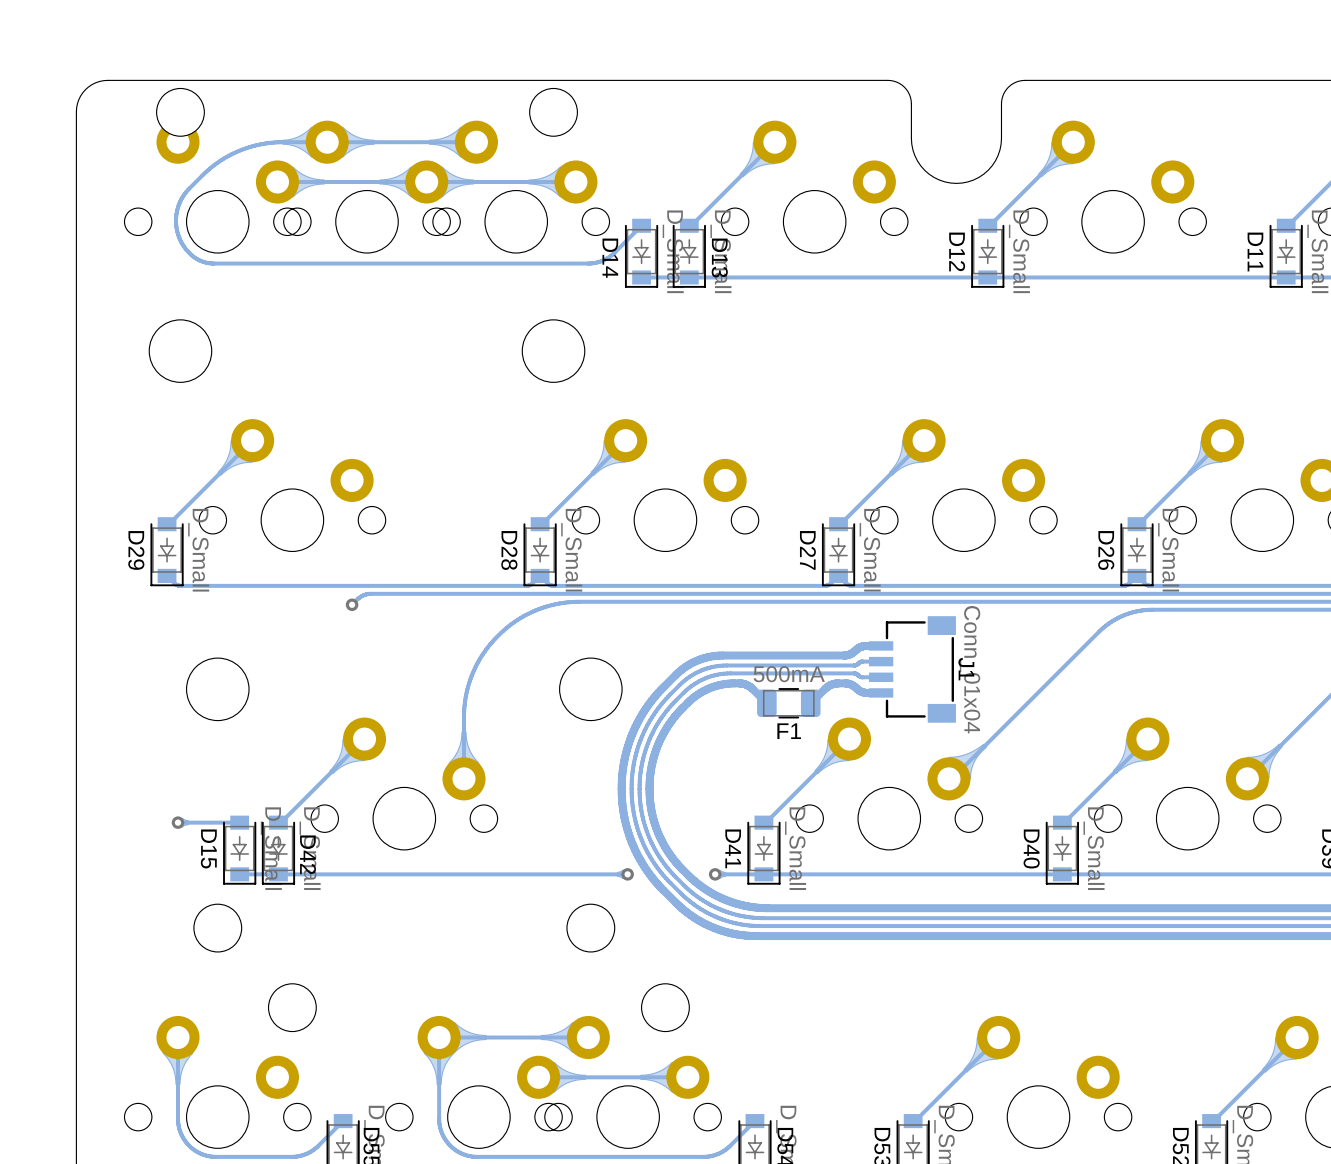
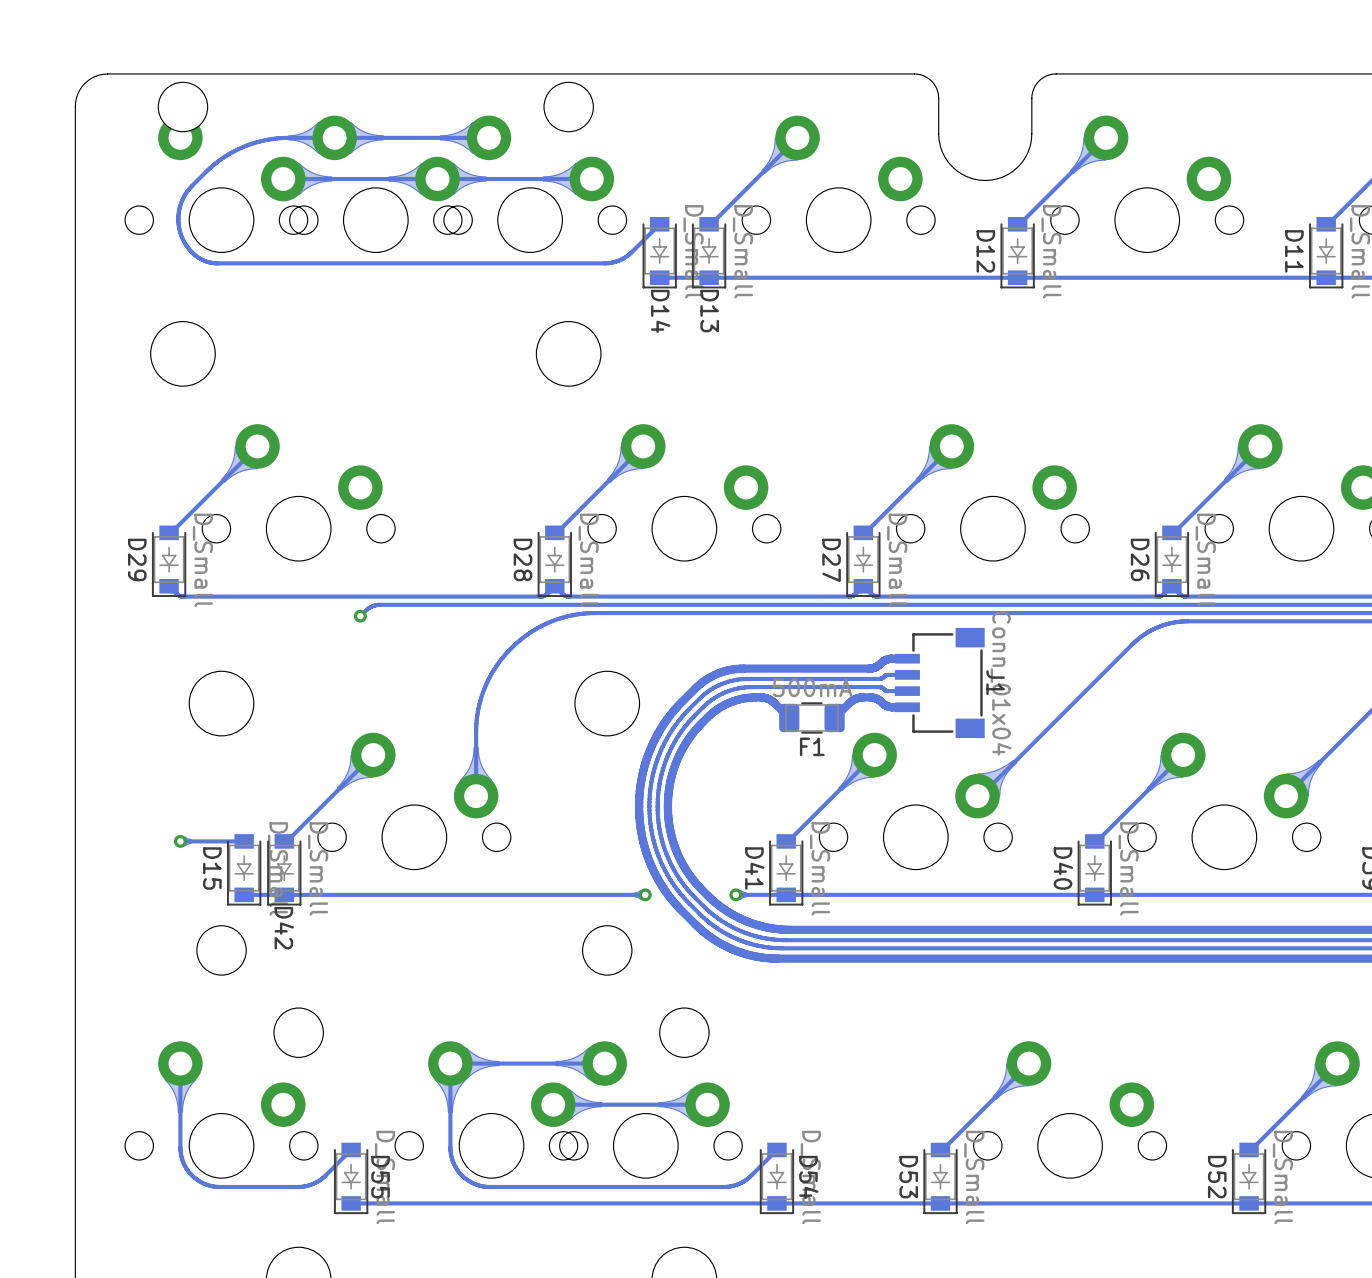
D14 name position: D14 (610, 258) -> D14 (660, 311)
D13 name position: D13 (719, 258) -> D13 (709, 311)
D42 name position: D42 (308, 854) -> D42 (284, 928)

